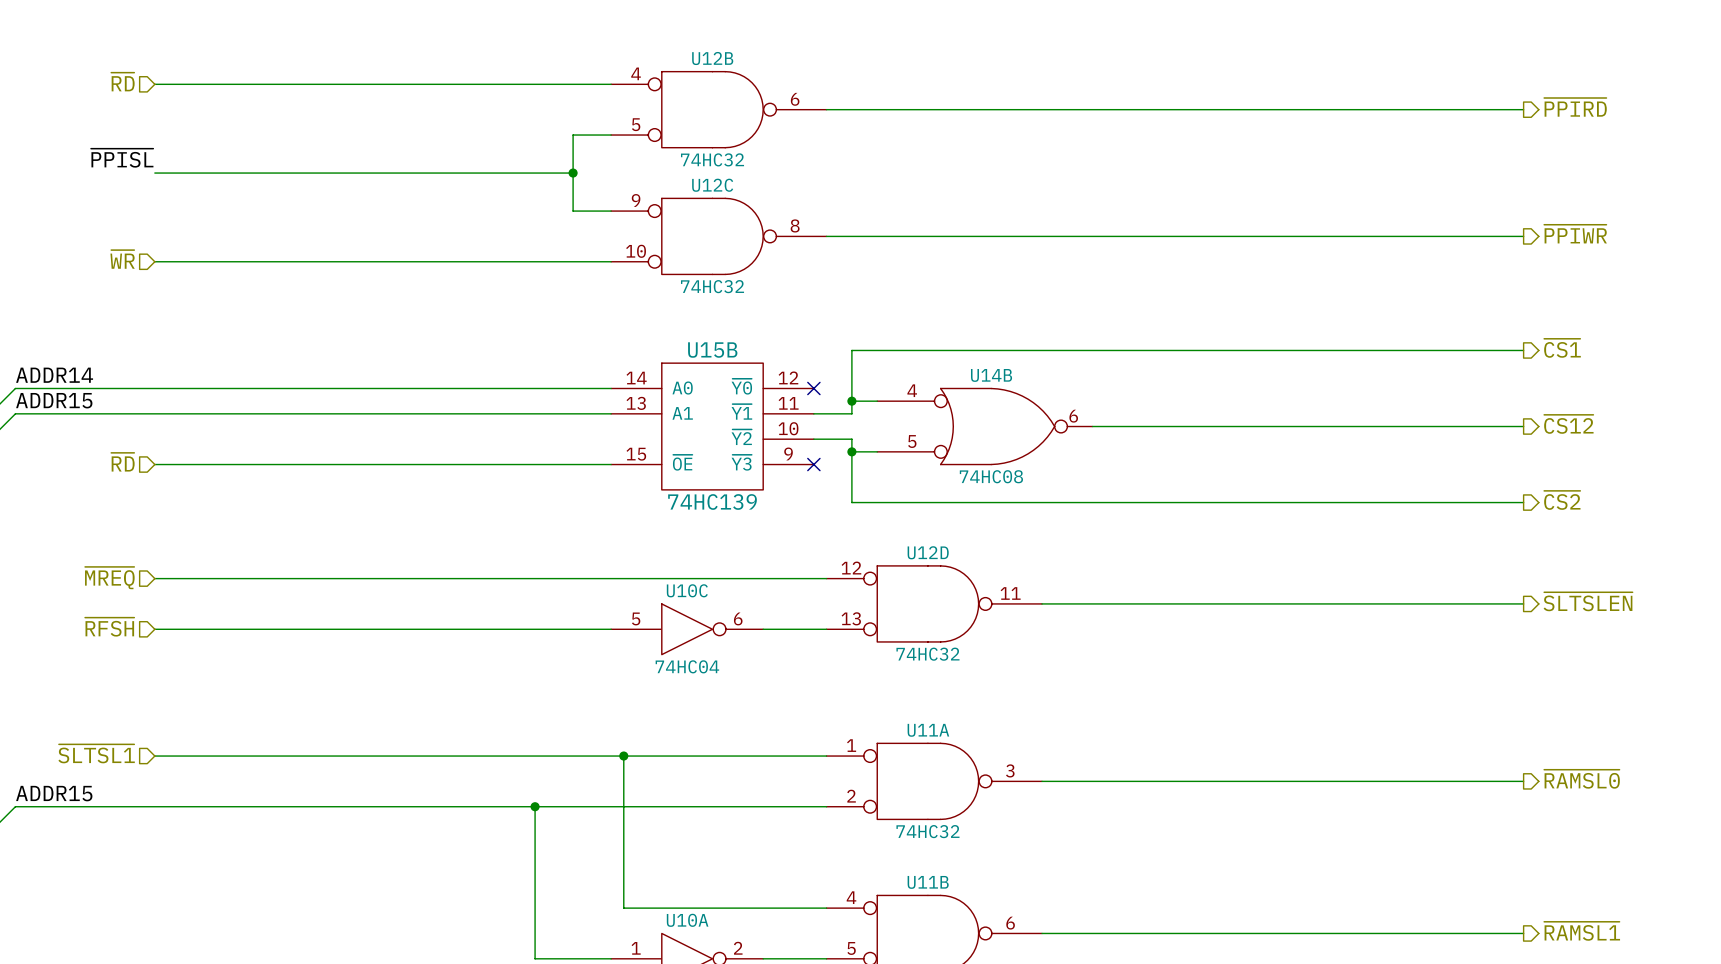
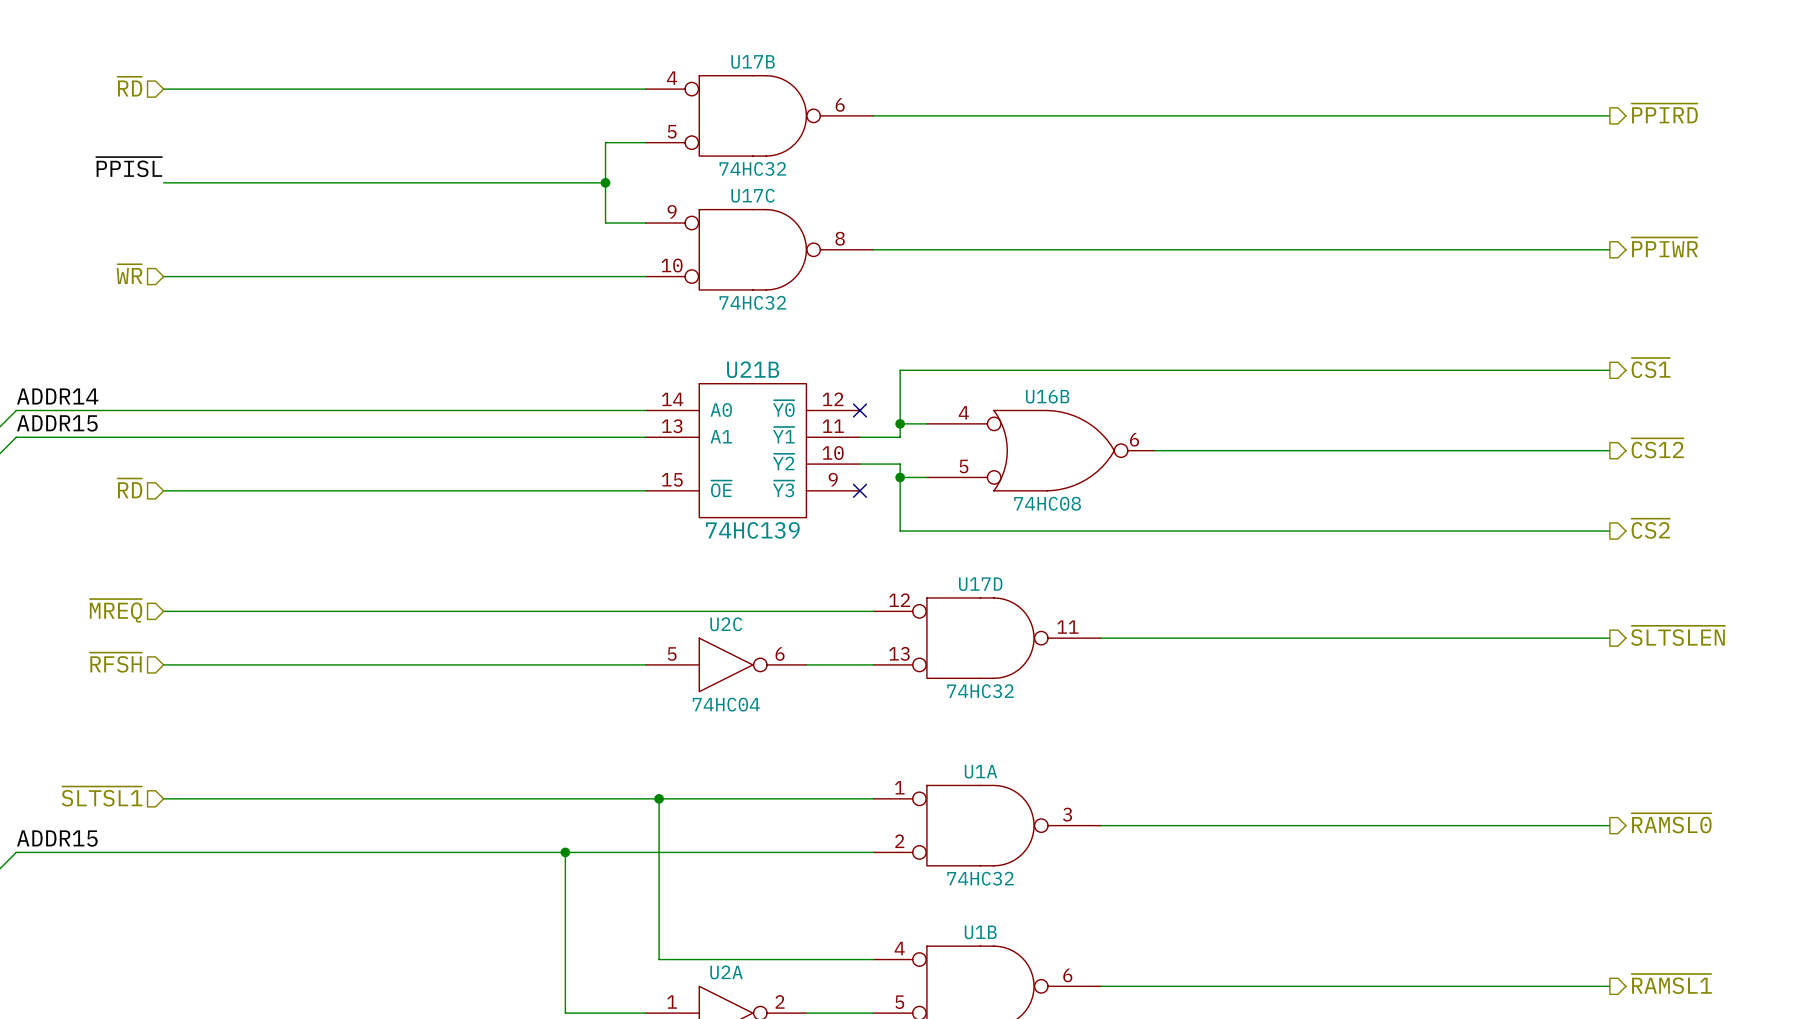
U12B name: U12B (712, 58) -> U17B (753, 61)
U12C name: U12C (712, 185) -> U17C (753, 195)
U15B name: U15B (712, 350) -> U21B (753, 369)
U14B name: U14B (991, 375) -> U16B (1047, 396)
U12D name: U12D (928, 552) -> U17D (980, 584)
U10C name: U10C (687, 590) -> U2C (726, 624)
U11A name: U11A (928, 730) -> U1A (980, 771)
U11B name: U11B (928, 882) -> U1B (980, 932)
U10A name: U10A (687, 920) -> U2A (726, 972)

